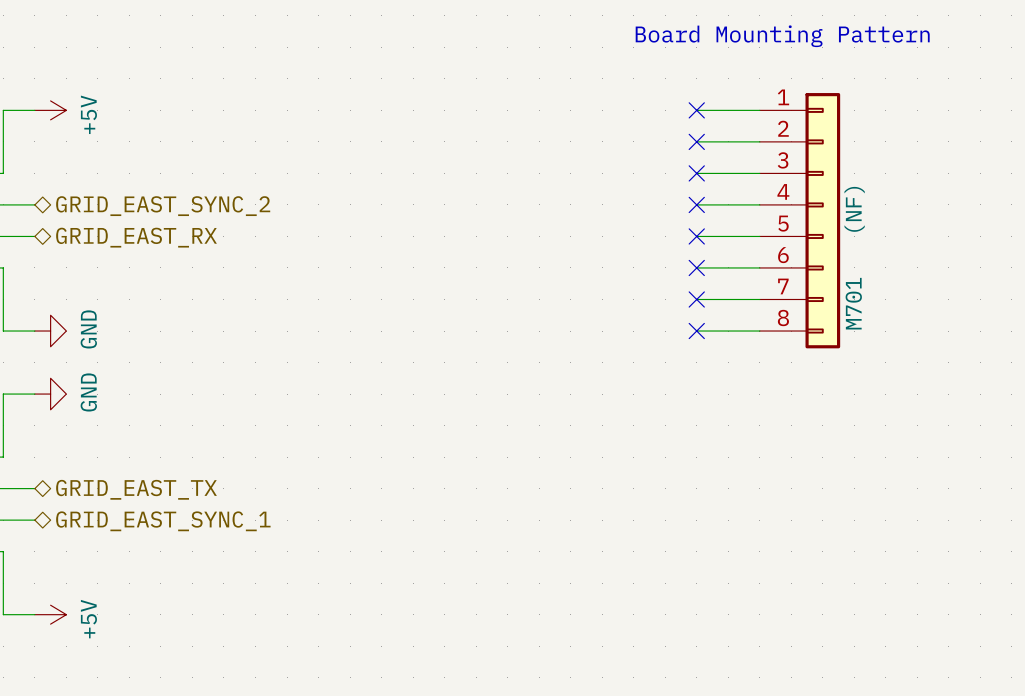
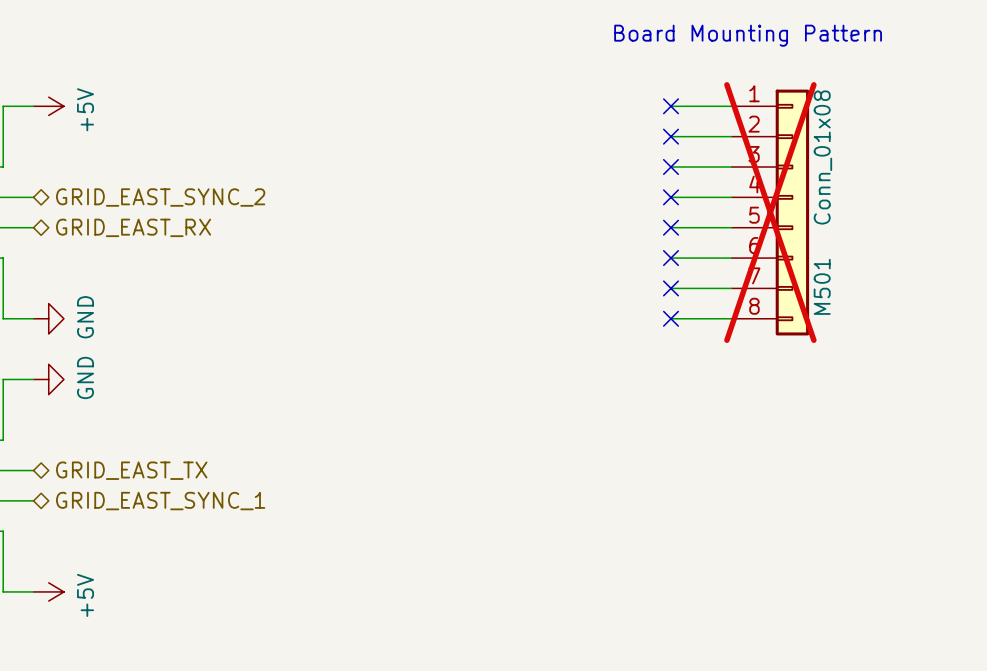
M701 value: (NF) (854, 209) -> Conn_01x08 (822, 157)
M701 do-not-place cross: none -> (770, 212)
M701 name: M701 (853, 303) -> M501 (822, 286)

